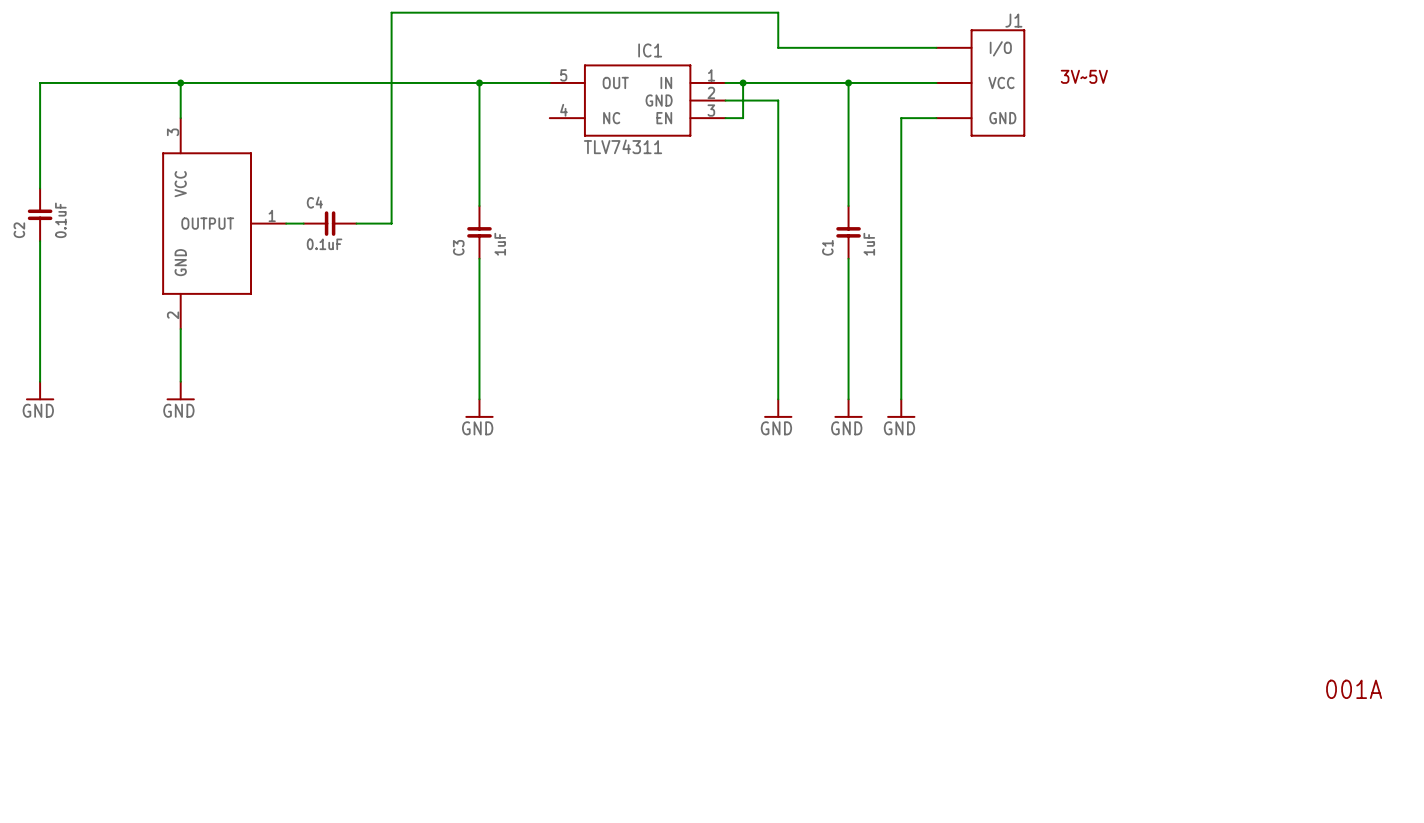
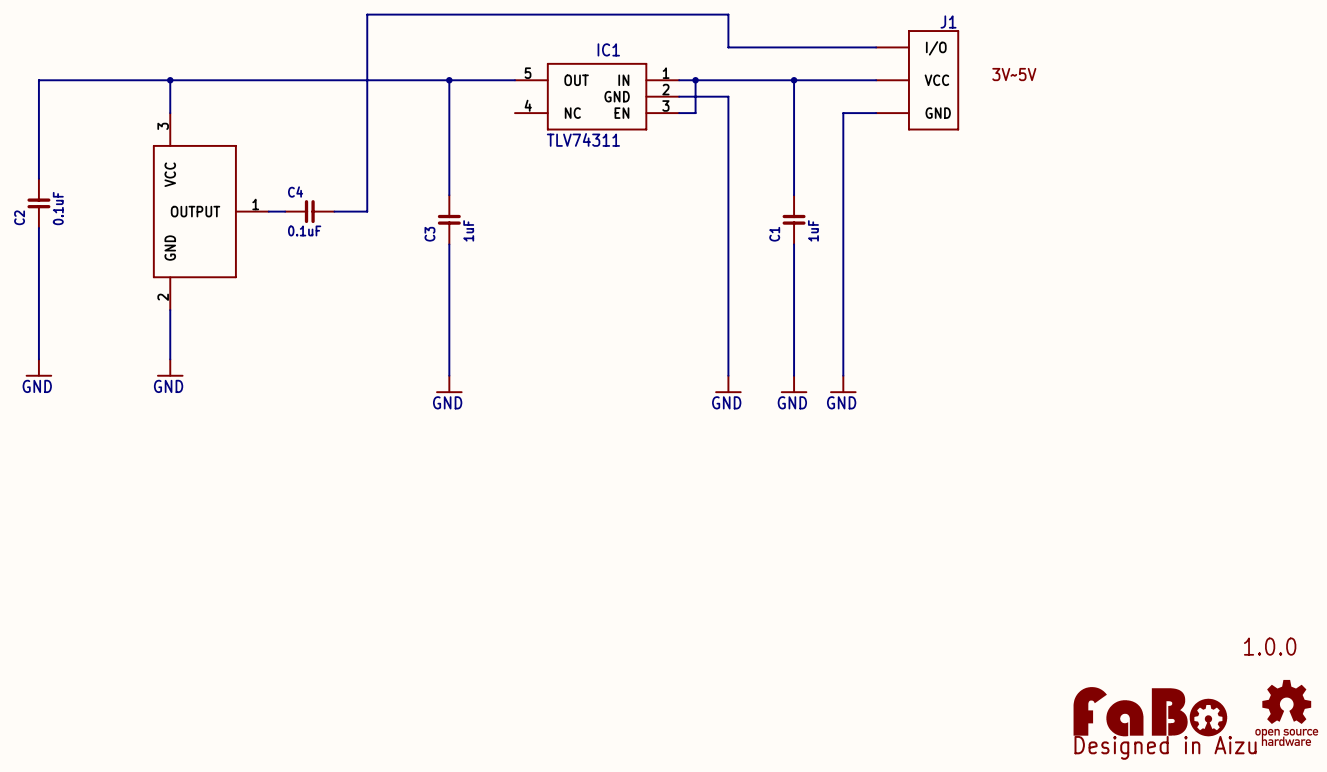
text: 001A (1354, 689) -> none
text: none -> 1.0.0 (1270, 646)
part: none -> (1150, 711)
part: none -> (1286, 712)

